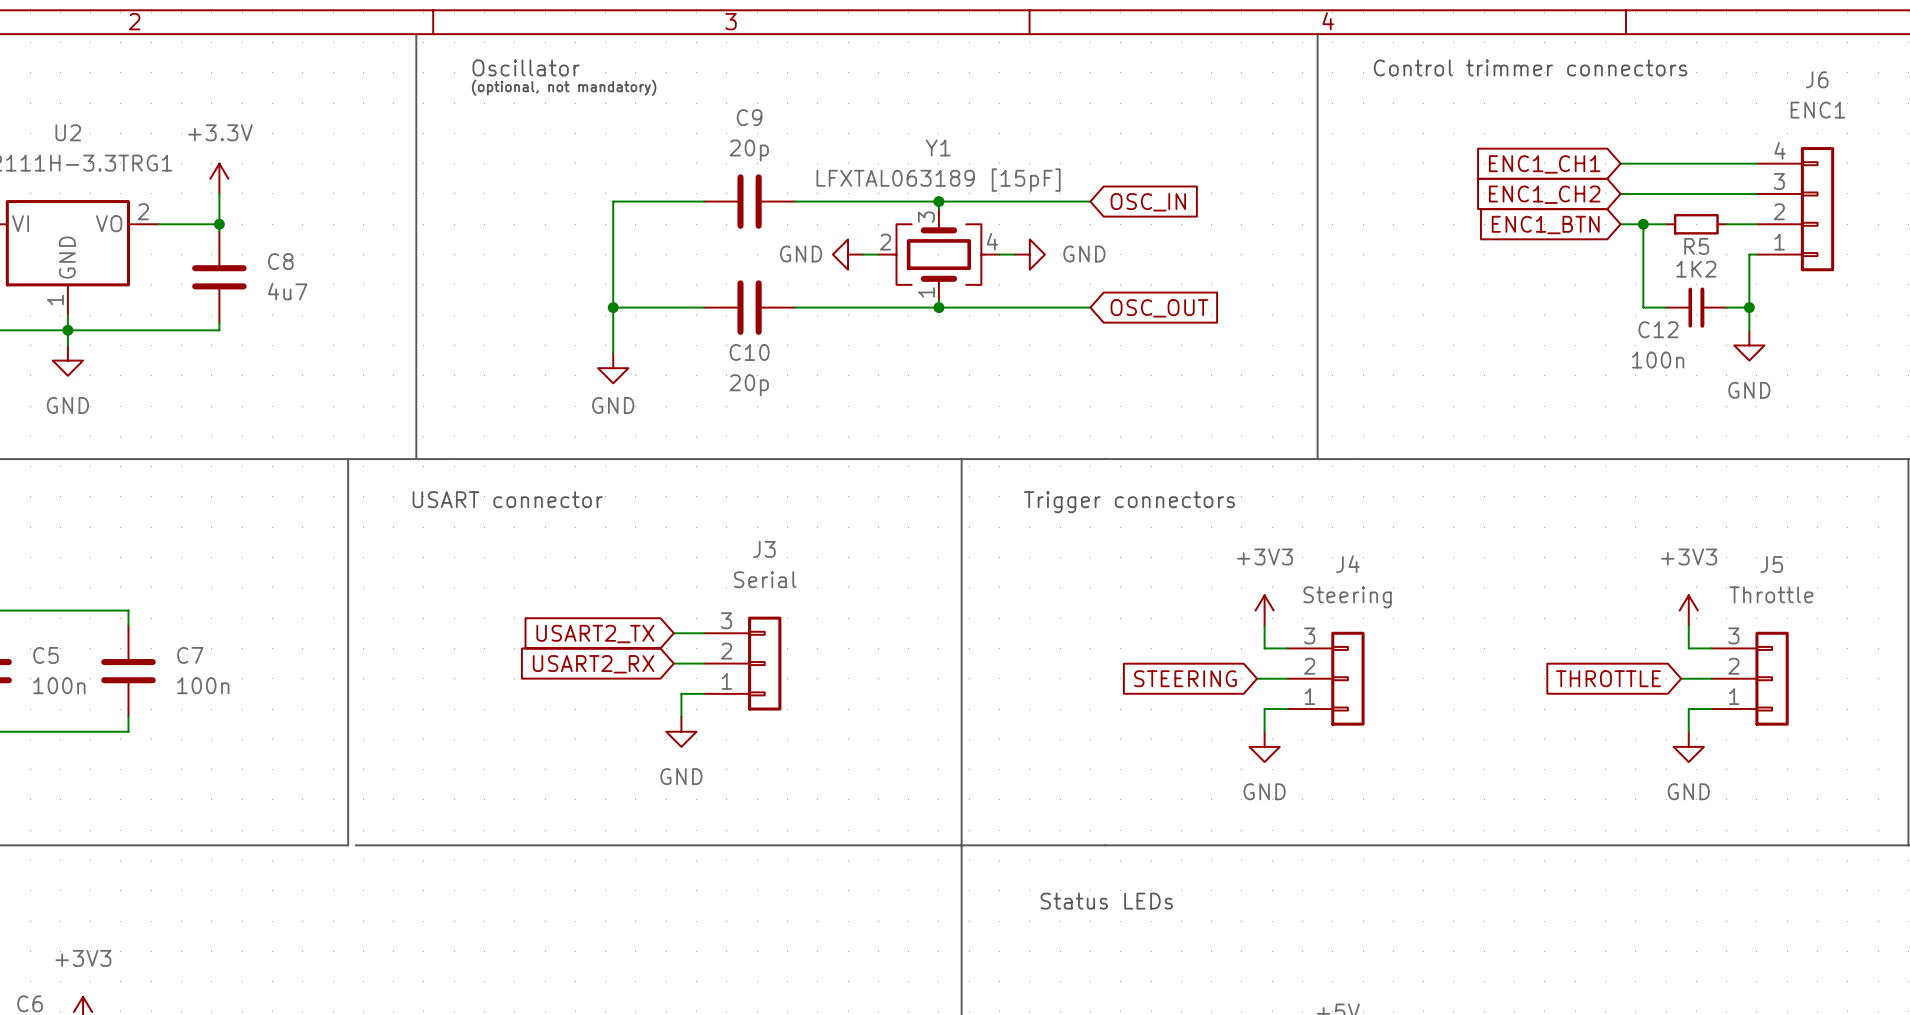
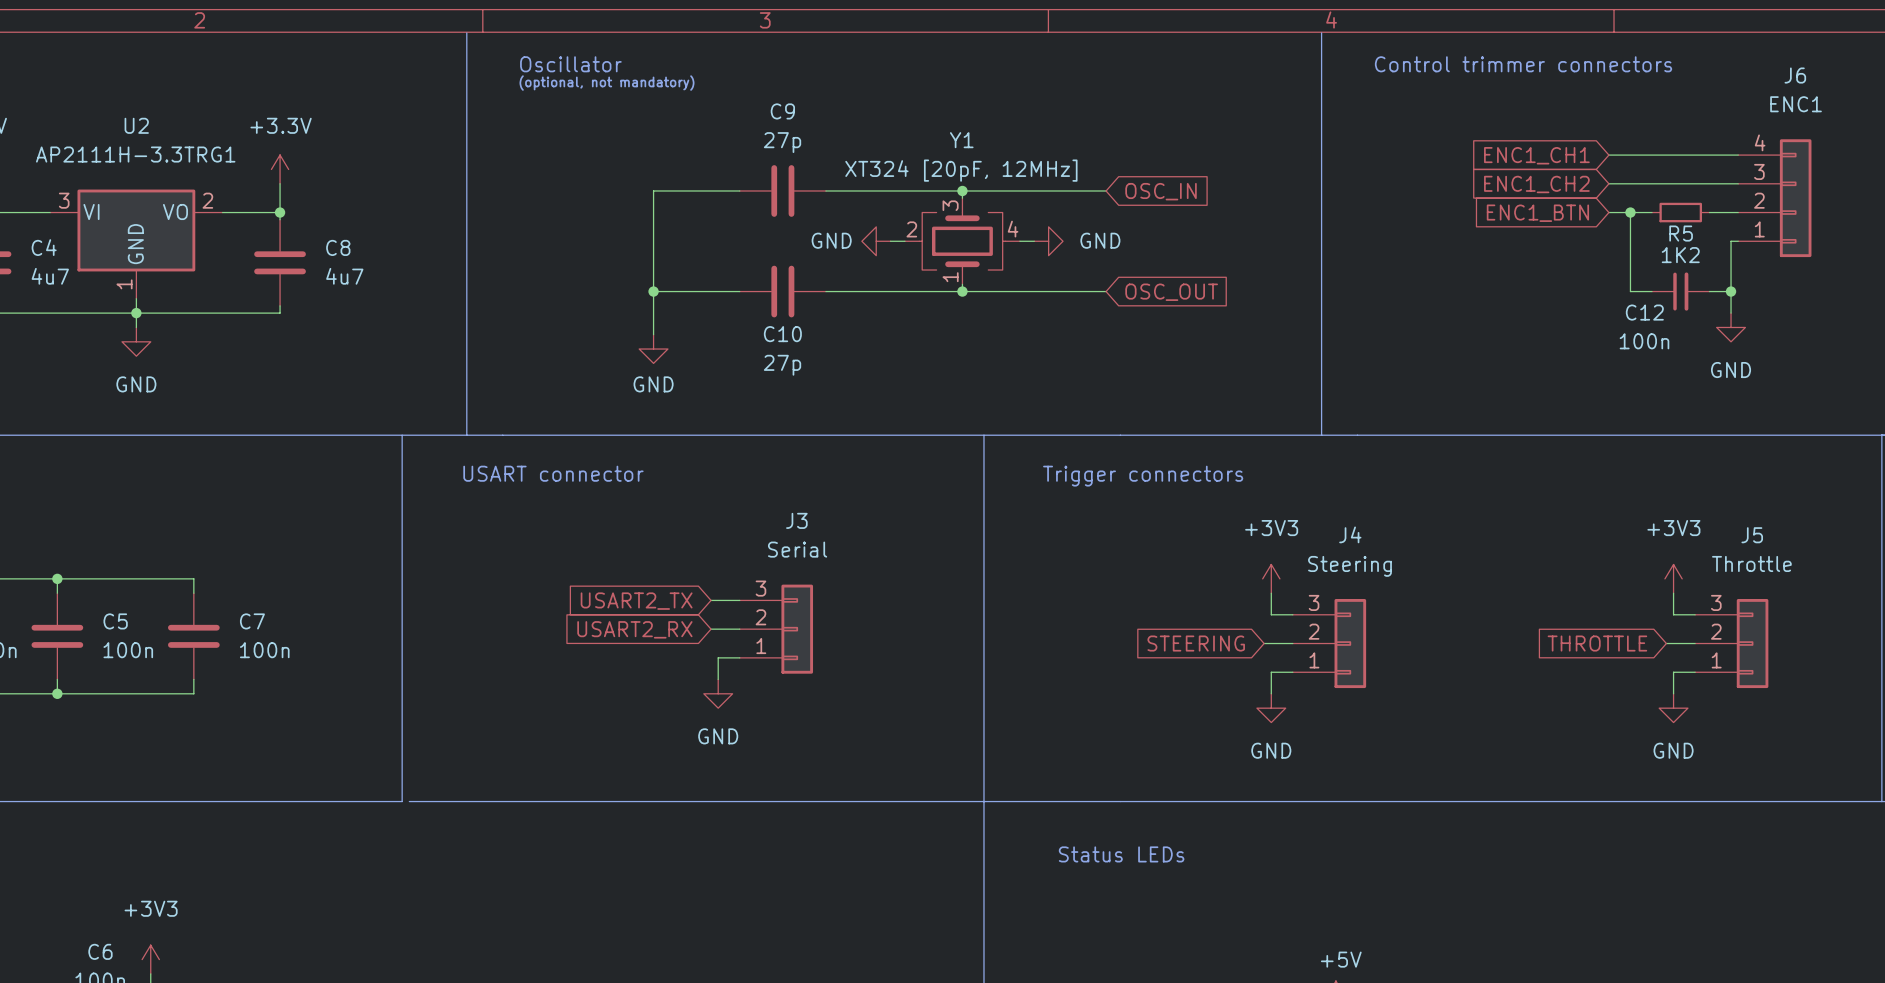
C9 value: 20p (749, 150) -> 27p (782, 142)
Y1 value: LFXTAL063189 [15pF] (938, 180) -> XT324 [20pF, 12MHz] (961, 170)
C10 value: 20p (749, 385) -> 27p (782, 365)

